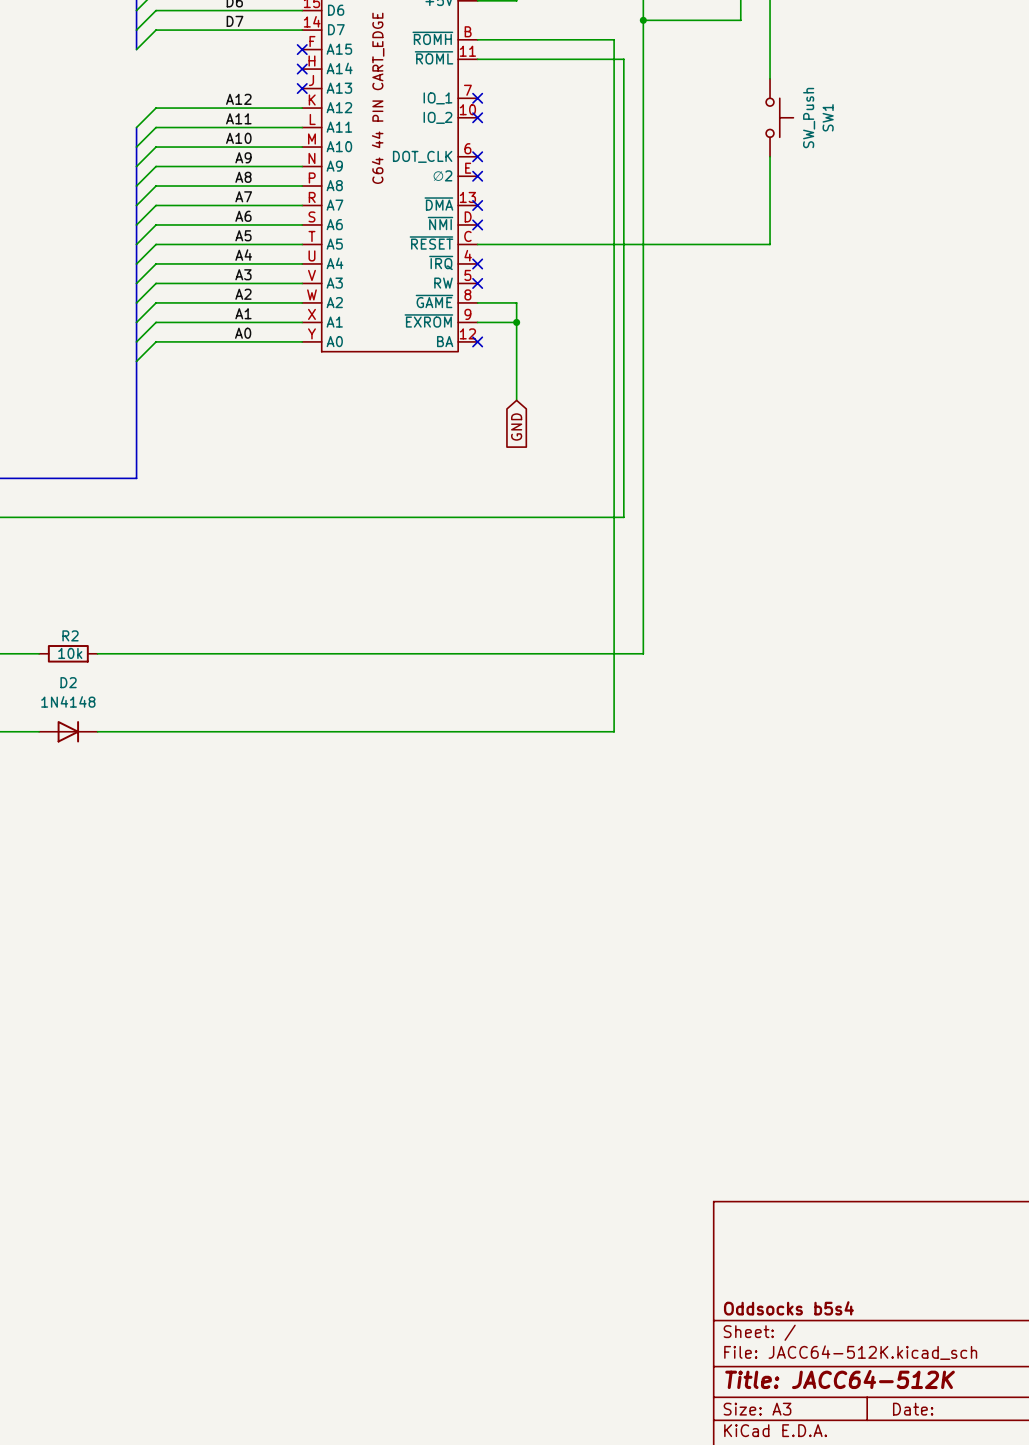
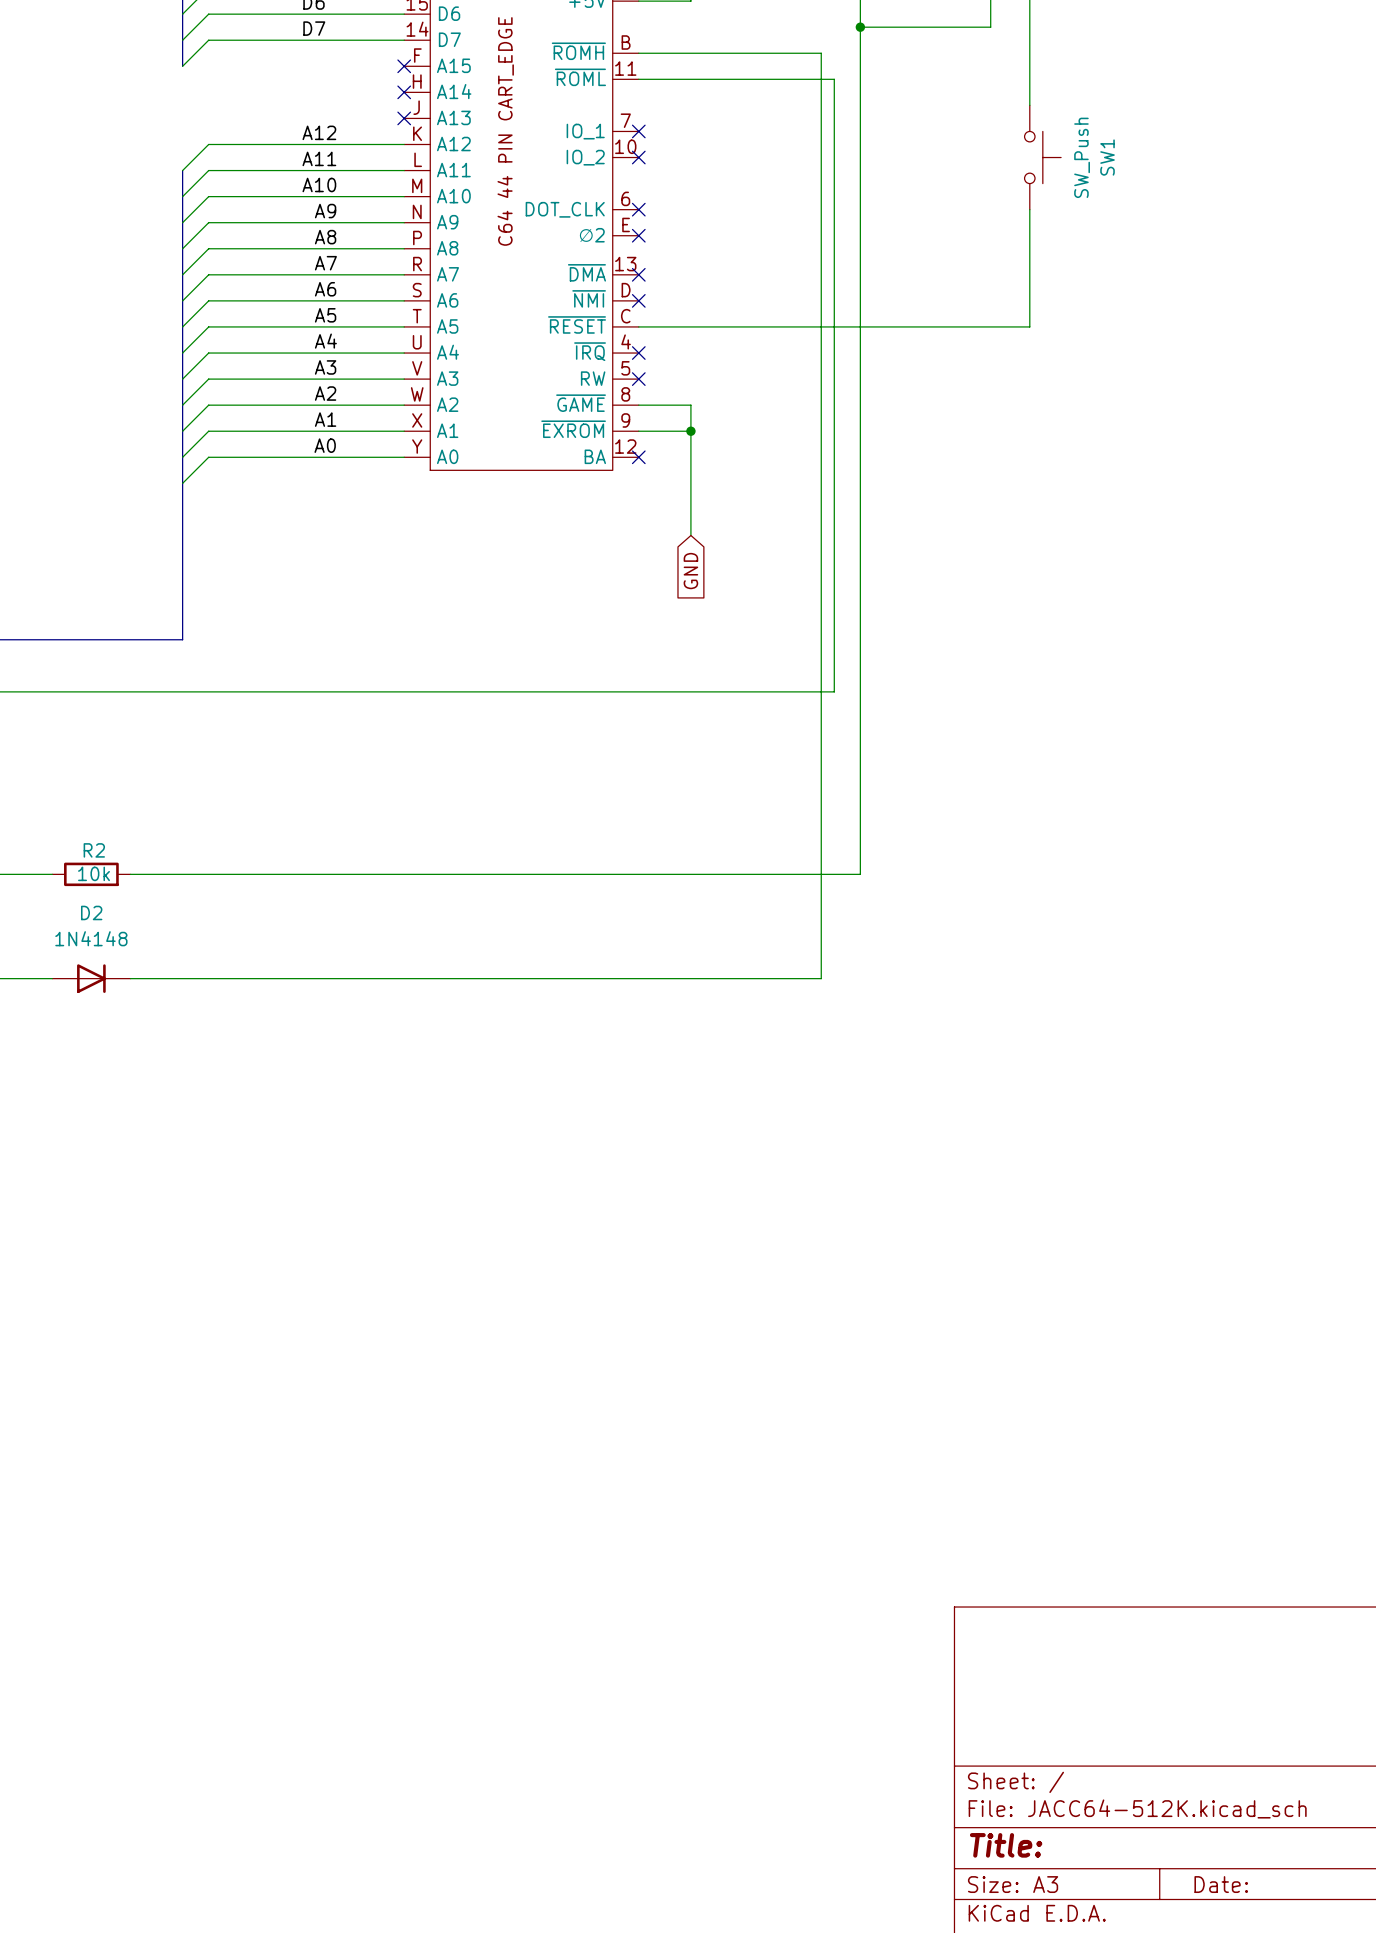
title block: Oddsocks b5s4 (788, 1308) -> none
title block: Title: JACC64-512K (840, 1379) -> Title: (1006, 1845)

